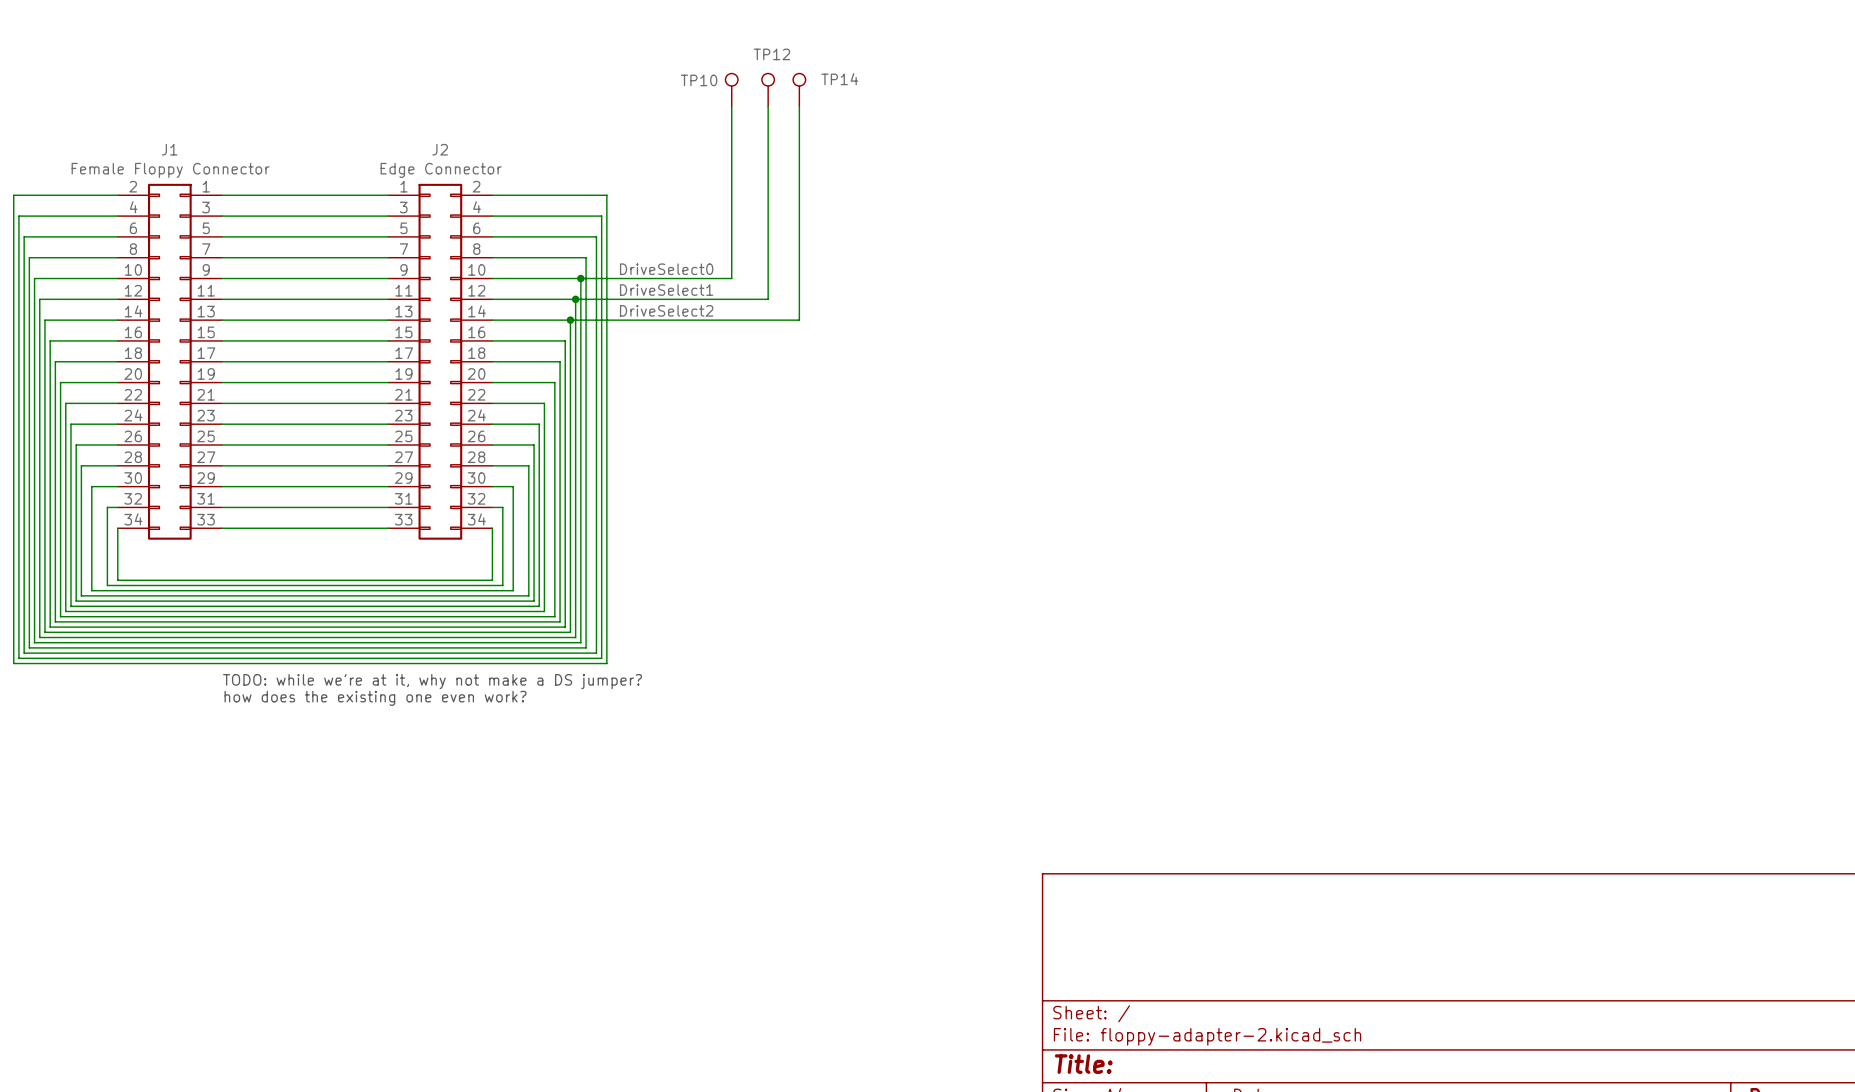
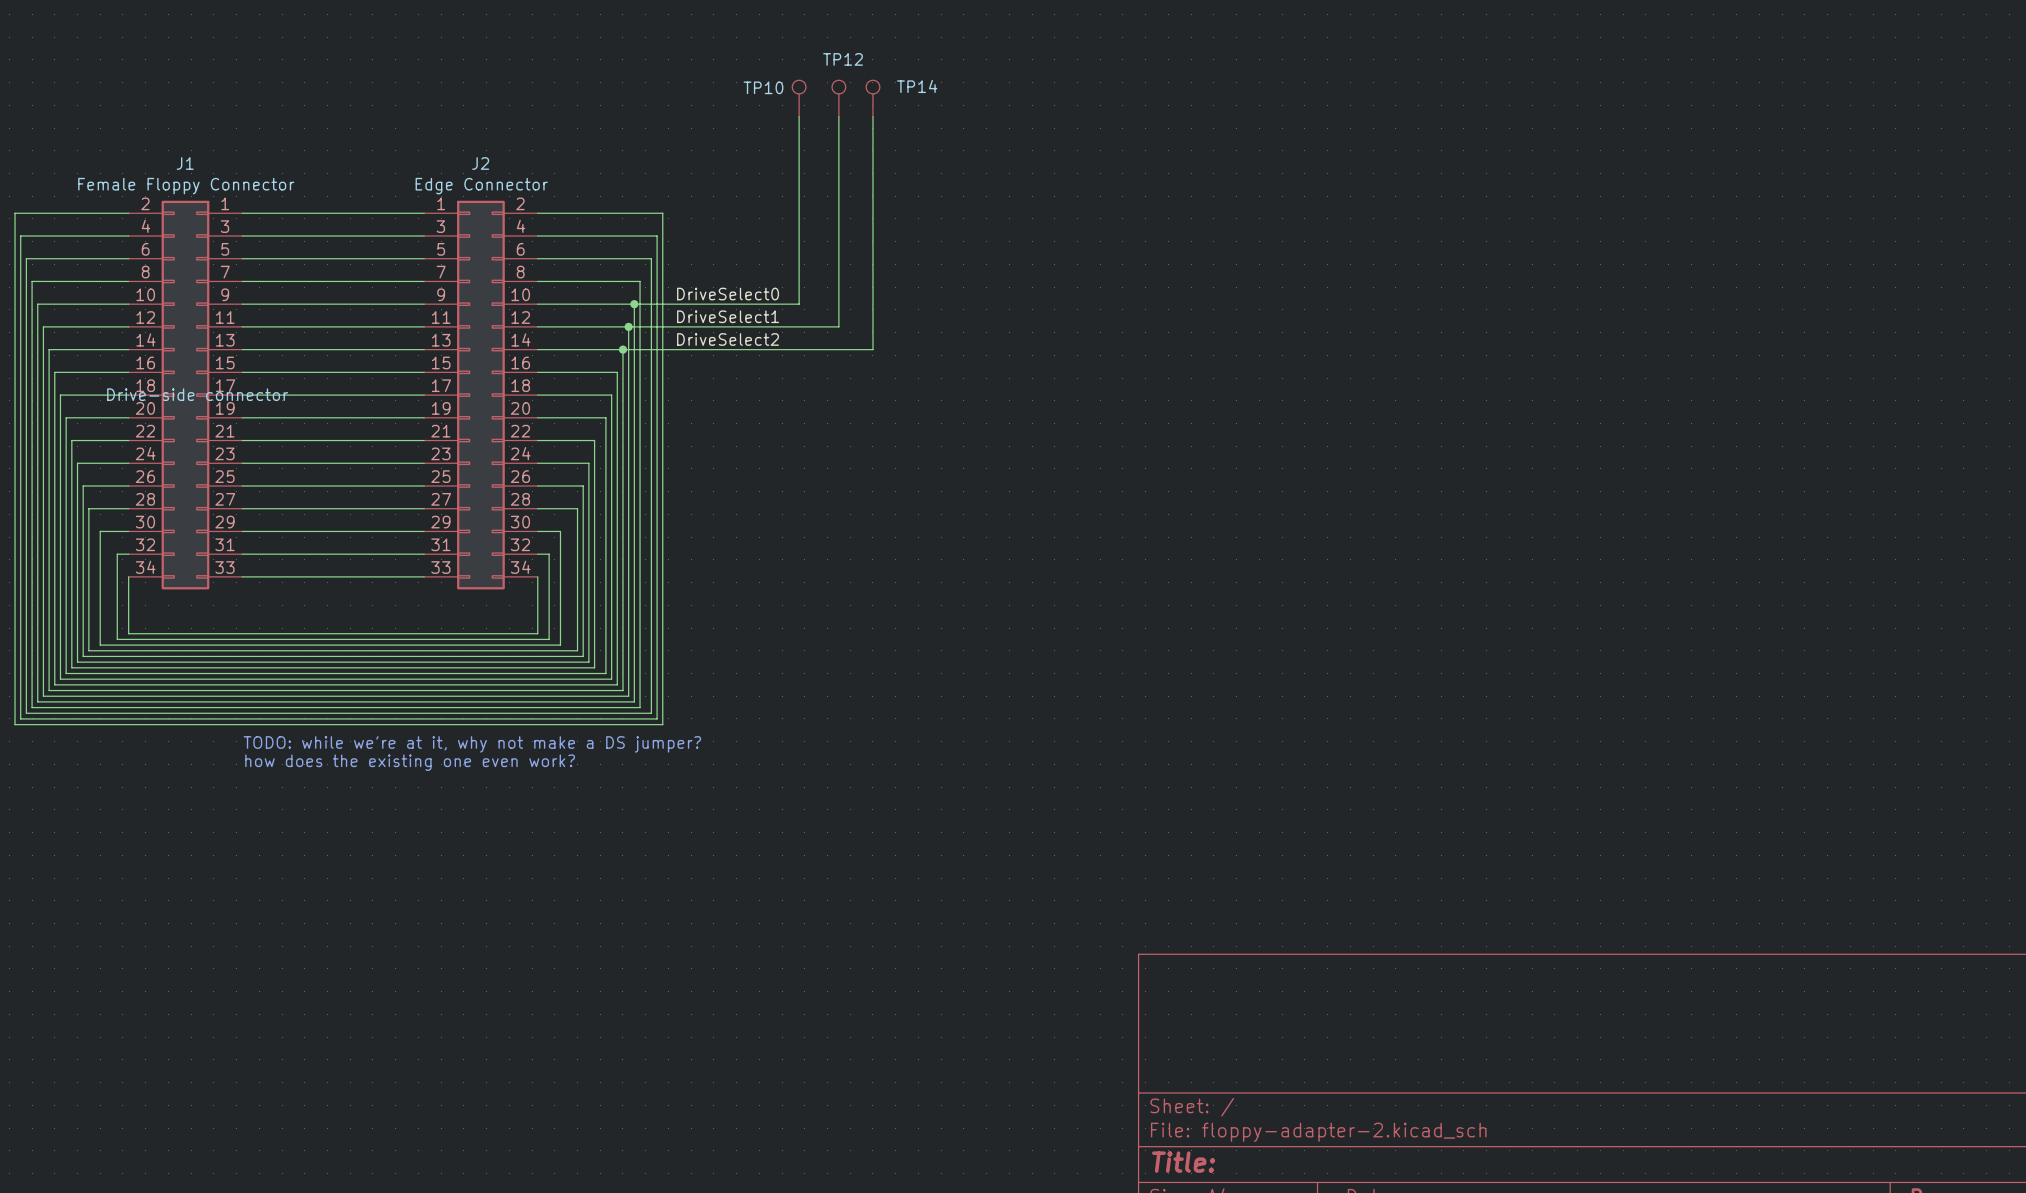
J1 text: none -> Drive-side connector (197, 394)

